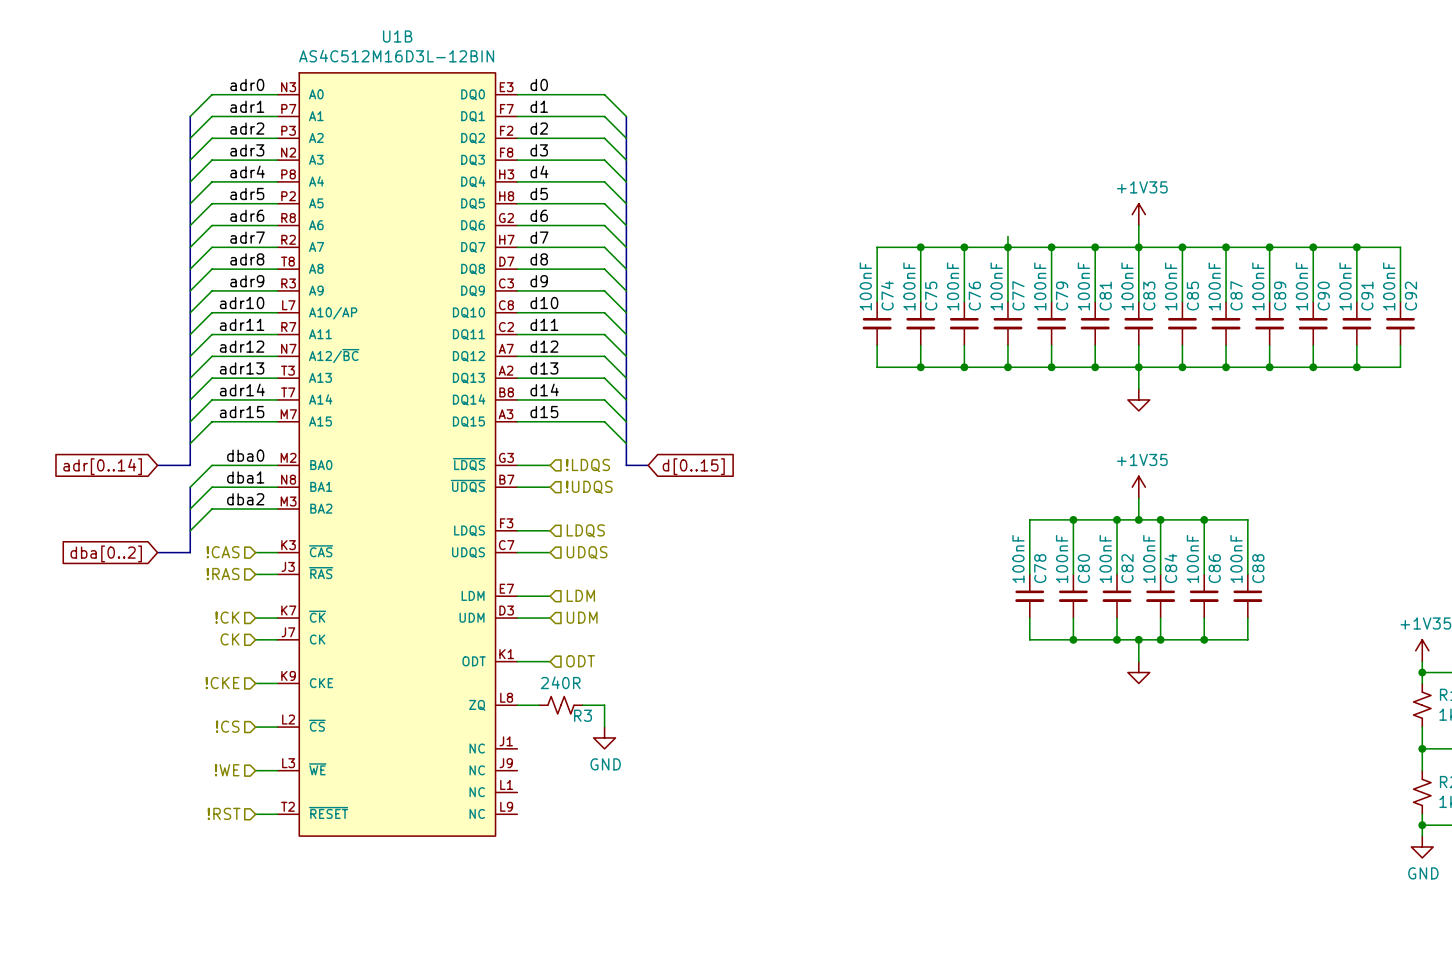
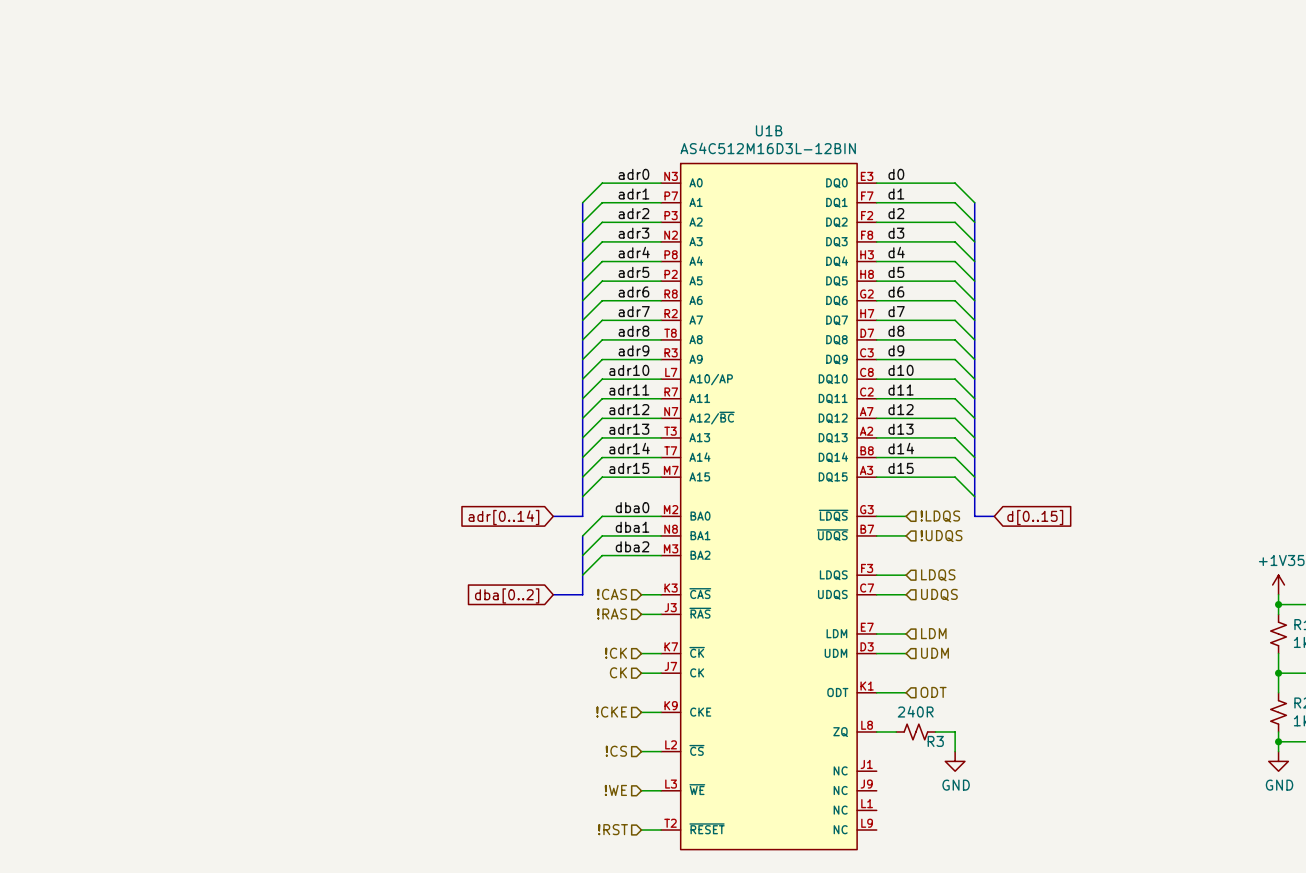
label: adr0 (247, 84) -> none
label: d0 (539, 84) -> none
wire: (277, 94) (212, 94) (190, 116) -> none
wire: (517, 94) (604, 94) (626, 116) -> none
label: adr1 (247, 106) -> none
label: d1 (539, 106) -> none
bus: (190, 116) (190, 465) (157, 465) -> none
wire: (277, 116) (212, 116) (190, 138) -> none
wire: (517, 116) (604, 116) (626, 138) -> none
bus: (626, 116) (626, 465) (648, 465) -> none
label: adr2 (247, 128) -> none
label: d2 (539, 128) -> none
wire: (277, 138) (212, 138) (190, 160) -> none
wire: (517, 138) (604, 138) (626, 160) -> none
label: adr3 (247, 150) -> none
label: d3 (539, 150) -> none
wire: (277, 160) (212, 160) (190, 181) -> none
wire: (517, 160) (604, 160) (626, 181) -> none
label: adr4 (247, 171) -> none
label: d4 (539, 171) -> none
wire: (277, 181) (212, 181) (190, 203) -> none
wire: (517, 181) (604, 181) (626, 203) -> none
label: adr5 (247, 193) -> none
label: d5 (539, 193) -> none
label: none -> adr0 (633, 174)
label: none -> d0 (896, 174)
wire: (277, 203) (212, 203) (190, 225) -> none
wire: (517, 203) (604, 203) (626, 225) -> none
wire: none -> (661, 183) (602, 183) (582, 202)
wire: none -> (876, 183) (955, 183) (974, 202)
power symbol: +1V35 (1138, 214) -> none
label: adr6 (247, 215) -> none
label: d6 (539, 215) -> none
label: none -> adr1 (633, 193)
label: none -> d1 (896, 193)
wire: (277, 225) (212, 225) (190, 247) -> none
wire: (517, 225) (604, 225) (626, 247) -> none
bus: none -> (582, 202) (582, 516) (553, 516)
wire: none -> (661, 202) (602, 202) (582, 222)
wire: none -> (876, 202) (955, 202) (974, 222)
bus: none -> (974, 202) (974, 516) (994, 516)
wire: (1138, 225) (1138, 301) -> none
wire: (1007, 236) (1007, 301) -> none
label: adr7 (247, 237) -> none
label: d7 (539, 237) -> none
label: none -> adr2 (633, 213)
label: none -> d2 (896, 213)
wire: (277, 247) (212, 247) (190, 269) -> none
wire: (517, 247) (604, 247) (626, 269) -> none
wire: none -> (661, 222) (602, 222) (582, 241)
junction: (920, 247) -> none
wire: (964, 247) (964, 301) -> none
junction: (964, 247) -> none
junction: (1007, 247) -> none
wire: (1051, 247) (1051, 301) -> none
junction: (1051, 247) -> none
wire: (1062, 247) (1400, 247) (1400, 301) -> (955, 222) (974, 241)
wire: (1095, 247) (1095, 301) -> none
junction: (1095, 247) -> none
junction: (1138, 247) -> none
wire: (1182, 247) (1182, 301) -> none
junction: (1182, 247) -> none
wire: (1226, 247) (1226, 301) -> none
junction: (1226, 247) -> none
wire: (1269, 247) (1269, 301) -> none
junction: (1269, 247) -> none
wire: (1313, 247) (1313, 301) -> none
junction: (1313, 247) -> none
wire: (1356, 247) (1356, 301) -> none
junction: (1356, 247) -> none
label: adr8 (247, 259) -> none
label: d8 (539, 259) -> none
label: none -> adr3 (633, 233)
label: none -> d3 (896, 233)
wire: (277, 269) (212, 269) (190, 290) -> none
wire: (517, 269) (604, 269) (626, 290) -> none
wire: none -> (661, 241) (602, 241) (582, 261)
wire: none -> (876, 241) (955, 241) (974, 261)
label: none -> adr4 (634, 252)
label: none -> d4 (896, 252)
label: adr9 (247, 281) -> none
label: d9 (539, 281) -> none
wire: (277, 290) (212, 290) (190, 312) -> none
wire: (517, 290) (604, 290) (626, 312) -> none
wire: none -> (661, 261) (602, 261) (582, 281)
wire: none -> (876, 261) (955, 261) (974, 281)
label: adr10 (242, 303) -> none
label: d10 (544, 303) -> none
label: none -> adr5 (633, 272)
label: none -> d5 (896, 272)
wire: (277, 312) (212, 312) (190, 334) -> none
wire: (517, 312) (604, 312) (626, 334) -> none
wire: none -> (661, 281) (602, 281) (582, 300)
wire: none -> (876, 281) (955, 281) (974, 300)
C74: 100nF (877, 323) -> none
C75: 100nF (920, 323) -> none
C76: 100nF (964, 323) -> none
C77: 100nF (1007, 323) -> none
C79: 100nF (1051, 323) -> none
C81: 100nF (1095, 323) -> none
C83: 100nF (1138, 323) -> none
C85: 100nF (1182, 323) -> none
C87: 100nF (1226, 323) -> none
C89: 100nF (1269, 323) -> none
C90: 100nF (1313, 323) -> none
C91: 100nF (1356, 323) -> none
C92: 100nF (1400, 323) -> none
label: adr11 (242, 324) -> none
label: d11 (544, 324) -> none
label: none -> adr6 (633, 291)
label: none -> d6 (896, 291)
wire: (277, 334) (212, 334) (190, 356) -> none
wire: (517, 334) (604, 334) (626, 356) -> none
wire: none -> (661, 300) (602, 300) (582, 320)
wire: none -> (876, 300) (955, 300) (974, 320)
wire: (877, 345) (877, 367) (1400, 367) (1400, 345) -> none
wire: (964, 345) (964, 367) -> none
wire: (1007, 345) (1007, 367) -> none
wire: (1051, 345) (1051, 367) -> none
wire: (1095, 345) (1095, 367) -> none
wire: (1138, 345) (1138, 389) -> none
wire: (1182, 345) (1182, 367) -> none
wire: (1226, 345) (1226, 367) -> none
wire: (1269, 345) (1269, 367) -> none
wire: (1313, 345) (1313, 367) -> none
wire: (1356, 345) (1356, 367) -> none
label: adr12 (242, 346) -> none
label: d12 (544, 346) -> none
label: none -> adr7 (634, 311)
label: none -> d7 (896, 311)
wire: (277, 356) (212, 356) (190, 378) -> none
wire: (517, 356) (604, 356) (626, 378) -> none
wire: none -> (661, 320) (602, 320) (582, 339)
wire: none -> (876, 320) (955, 320) (974, 339)
junction: (920, 367) -> none
junction: (964, 367) -> none
junction: (1007, 367) -> none
junction: (1051, 367) -> none
junction: (1095, 367) -> none
junction: (1138, 367) -> none
junction: (1182, 367) -> none
junction: (1226, 367) -> none
junction: (1269, 367) -> none
junction: (1313, 367) -> none
junction: (1356, 367) -> none
label: adr13 (242, 368) -> none
label: d13 (544, 368) -> none
label: none -> adr8 (633, 331)
label: none -> d8 (896, 331)
wire: (277, 378) (212, 378) (190, 399) -> none
wire: (517, 378) (604, 378) (626, 399) -> none
wire: none -> (661, 339) (602, 339) (582, 359)
wire: none -> (876, 339) (955, 339) (974, 359)
label: adr14 (242, 389) -> none
label: d14 (544, 389) -> none
label: none -> adr9 (633, 350)
label: none -> d9 (896, 350)
wire: (277, 399) (212, 399) (190, 421) -> none
wire: (517, 399) (604, 399) (626, 421) -> none
wire: none -> (661, 359) (602, 359) (582, 379)
wire: none -> (876, 359) (955, 359) (974, 379)
power symbol: (1138, 399) -> none
label: adr15 (242, 412) -> none
label: d15 (544, 412) -> none
label: none -> adr10 (629, 370)
label: none -> d10 (901, 370)
wire: (277, 421) (212, 421) (190, 443) -> none
wire: (517, 421) (604, 421) (626, 443) -> none
wire: none -> (661, 379) (602, 379) (582, 398)
wire: none -> (876, 379) (955, 379) (974, 398)
label: none -> adr11 (629, 390)
label: none -> d11 (901, 390)
wire: none -> (661, 398) (602, 398) (582, 418)
wire: none -> (876, 398) (955, 398) (974, 418)
U1B position: (397, 454) -> (768, 506)
label: dba0 (245, 455) -> none
label: none -> adr12 (629, 409)
label: none -> d12 (901, 409)
wire: (277, 465) (212, 465) (190, 487) -> none
wire: (517, 465) (550, 465) -> none
hierarchical label: !LDQS (588, 465) -> none
wire: none -> (661, 418) (602, 418) (582, 437)
wire: none -> (876, 418) (955, 418) (974, 437)
global label: adr[0..14] (102, 466) -> none
global label: d[0..15] (693, 466) -> none
label: dba1 (245, 477) -> none
label: none -> adr13 (629, 429)
label: none -> d13 (901, 429)
bus: (190, 487) (190, 552) (157, 552) -> none
wire: (277, 487) (212, 487) (190, 508) -> none
wire: (517, 487) (550, 487) -> none
hierarchical label: !UDQS (589, 487) -> none
wire: none -> (661, 437) (602, 437) (582, 457)
wire: none -> (876, 437) (955, 437) (974, 457)
power symbol: +1V35 (1138, 487) -> none
wire: (1138, 498) (1138, 519) -> none
label: dba2 (245, 499) -> none
label: none -> adr14 (629, 448)
label: none -> d14 (901, 448)
wire: (277, 508) (212, 508) (190, 530) -> none
wire: none -> (661, 457) (602, 457) (582, 477)
wire: none -> (876, 457) (955, 457) (974, 477)
wire: (1073, 519) (1073, 574) -> none
junction: (1073, 519) -> none
wire: (1117, 519) (1117, 574) -> none
junction: (1117, 519) -> none
junction: (1138, 519) -> none
wire: (1160, 519) (1160, 574) -> none
junction: (1160, 519) -> none
wire: (1204, 519) (1204, 574) -> none
junction: (1204, 519) -> none
label: none -> adr15 (629, 468)
label: none -> d15 (901, 468)
wire: (517, 530) (550, 530) -> none
hierarchical label: LDQS (585, 530) -> none
wire: none -> (661, 477) (602, 477) (582, 496)
wire: none -> (876, 477) (955, 477) (974, 496)
hierarchical label: !CAS (223, 552) -> none
wire: (255, 552) (277, 552) -> none
wire: (517, 552) (550, 552) -> none
hierarchical label: UDQS (587, 552) -> none
global label: dba[0..2] (106, 553) -> none
label: none -> dba0 (632, 507)
hierarchical label: !RAS (223, 574) -> none
wire: (255, 574) (277, 574) -> none
wire: none -> (661, 516) (602, 516) (582, 535)
wire: none -> (876, 516) (906, 516)
wire: (1029, 574) (1029, 519) (1247, 519) (1247, 574) -> none
hierarchical label: none -> !LDQS (940, 516)
global label: none -> adr[0..14] (503, 517)
global label: none -> d[0..15] (1035, 517)
label: none -> dba1 (632, 527)
hierarchical label: LDM (580, 595) -> none
wire: (517, 596) (550, 596) -> none
bus: none -> (582, 535) (582, 594) (553, 594)
wire: none -> (661, 535) (602, 535) (582, 555)
wire: none -> (876, 535) (906, 535)
C78: 100nF (1029, 596) -> none
hierarchical label: none -> !UDQS (941, 536)
C80: 100nF (1073, 596) -> none
C82: 100nF (1117, 596) -> none
C84: 100nF (1160, 596) -> none
C86: 100nF (1204, 596) -> none
C88: 100nF (1247, 596) -> none
label: none -> dba2 (632, 546)
hierarchical label: !CK (227, 617) -> none
hierarchical label: UDM (582, 617) -> none
wire: (255, 618) (277, 618) -> none
wire: (517, 618) (550, 618) -> none
wire: none -> (661, 555) (602, 555) (582, 575)
wire: (1029, 618) (1029, 639) (1247, 639) (1247, 618) -> none
wire: (1073, 618) (1073, 639) -> none
wire: (1117, 618) (1117, 639) -> none
wire: (1160, 618) (1160, 639) -> none
wire: (1204, 618) (1204, 639) -> none
hierarchical label: CK (230, 639) -> none
wire: (255, 639) (277, 639) -> none
wire: none -> (876, 575) (906, 575)
hierarchical label: none -> LDQS (938, 575)
junction: (1073, 639) -> none
junction: (1117, 639) -> none
wire: (1138, 639) (1138, 661) -> none
junction: (1138, 639) -> none
junction: (1160, 639) -> none
junction: (1204, 639) -> none
wire: (517, 661) (550, 661) -> none
hierarchical label: ODT (580, 661) -> none
hierarchical label: none -> !CAS (612, 594)
wire: none -> (641, 594) (661, 594)
wire: none -> (876, 594) (906, 594)
hierarchical label: none -> UDQS (939, 594)
global label: none -> dba[0..2] (507, 595)
power symbol: (1138, 672) -> none
hierarchical label: !CKE (222, 683) -> none
wire: (255, 683) (277, 683) -> none
hierarchical label: none -> !RAS (612, 614)
wire: none -> (641, 614) (661, 614)
hierarchical label: none -> LDM (933, 633)
wire: (517, 705) (539, 705) -> (641, 653) (661, 653)
R3 position: (560, 705) -> (915, 731)
wire: (582, 705) (604, 705) (604, 727) -> none
wire: none -> (876, 633) (906, 633)
hierarchical label: !CS (227, 726) -> none
hierarchical label: none -> !CK (616, 653)
hierarchical label: none -> UDM (934, 653)
wire: (255, 727) (277, 727) -> none
wire: none -> (876, 653) (906, 653)
power symbol: GND (604, 737) -> none
hierarchical label: none -> CK (618, 672)
wire: none -> (641, 673) (661, 673)
hierarchical label: !WE (227, 770) -> none
wire: (255, 770) (277, 770) -> none
wire: none -> (876, 692) (906, 692)
hierarchical label: none -> ODT (933, 692)
hierarchical label: none -> !CKE (611, 712)
wire: none -> (641, 712) (661, 712)
hierarchical label: !RST (224, 813) -> none
wire: (255, 814) (277, 814) -> none
wire: none -> (876, 731) (896, 731)
wire: none -> (935, 731) (955, 731) (955, 751)
hierarchical label: none -> !CS (616, 751)
wire: none -> (641, 751) (661, 751)
power symbol: none -> GND (955, 761)
hierarchical label: none -> !WE (615, 790)
wire: none -> (641, 790) (661, 790)
hierarchical label: none -> !RST (613, 829)
wire: none -> (641, 830) (661, 830)

